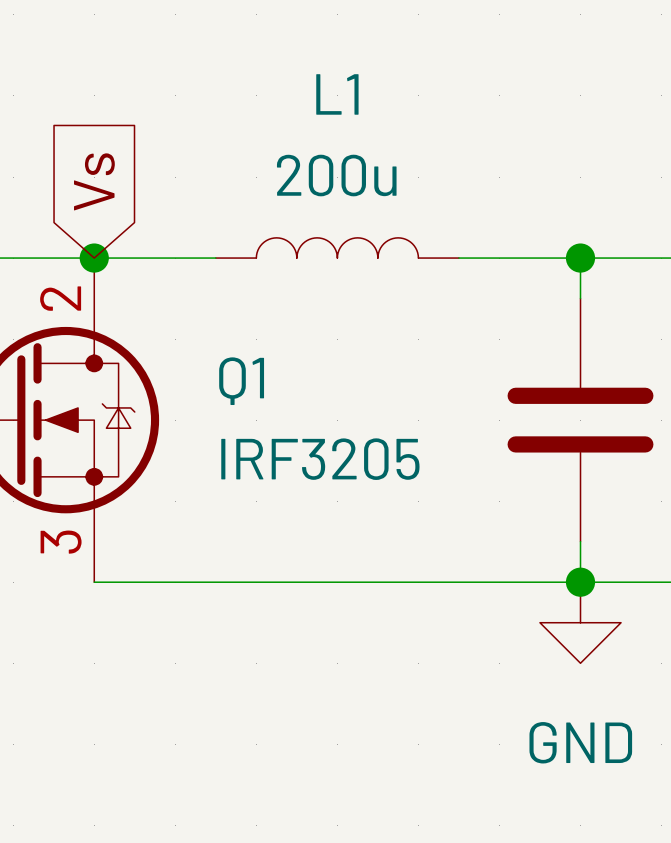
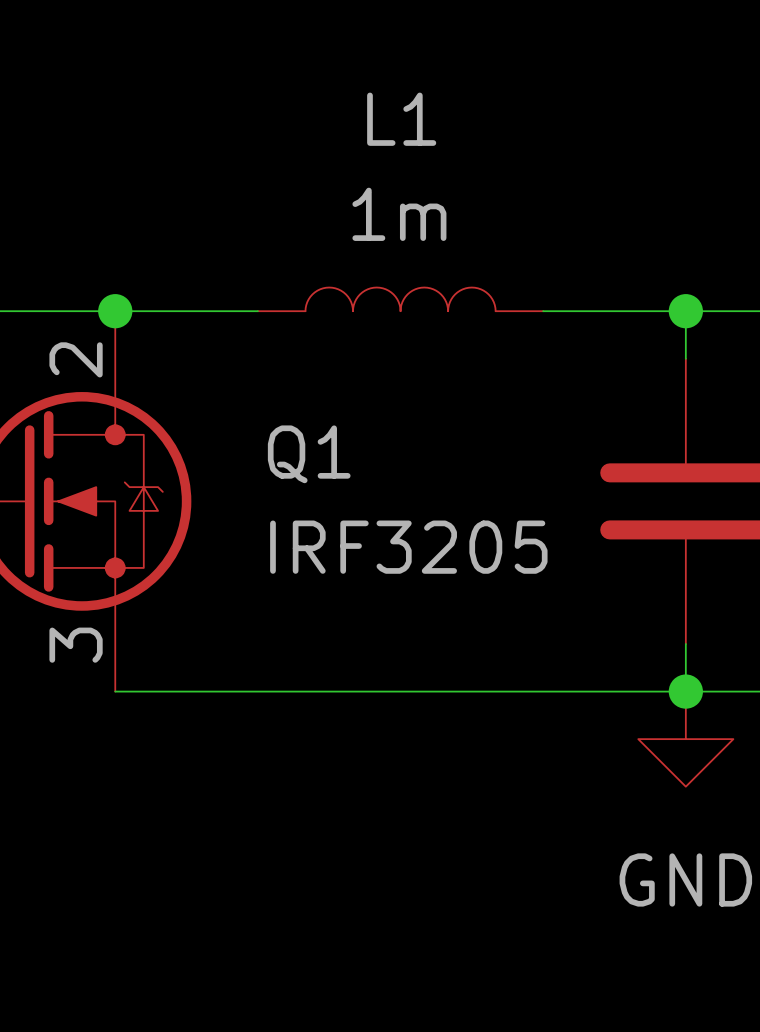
L1 value: 200u (336, 175) -> 1m (399, 214)
global label: Vs (94, 181) -> none

